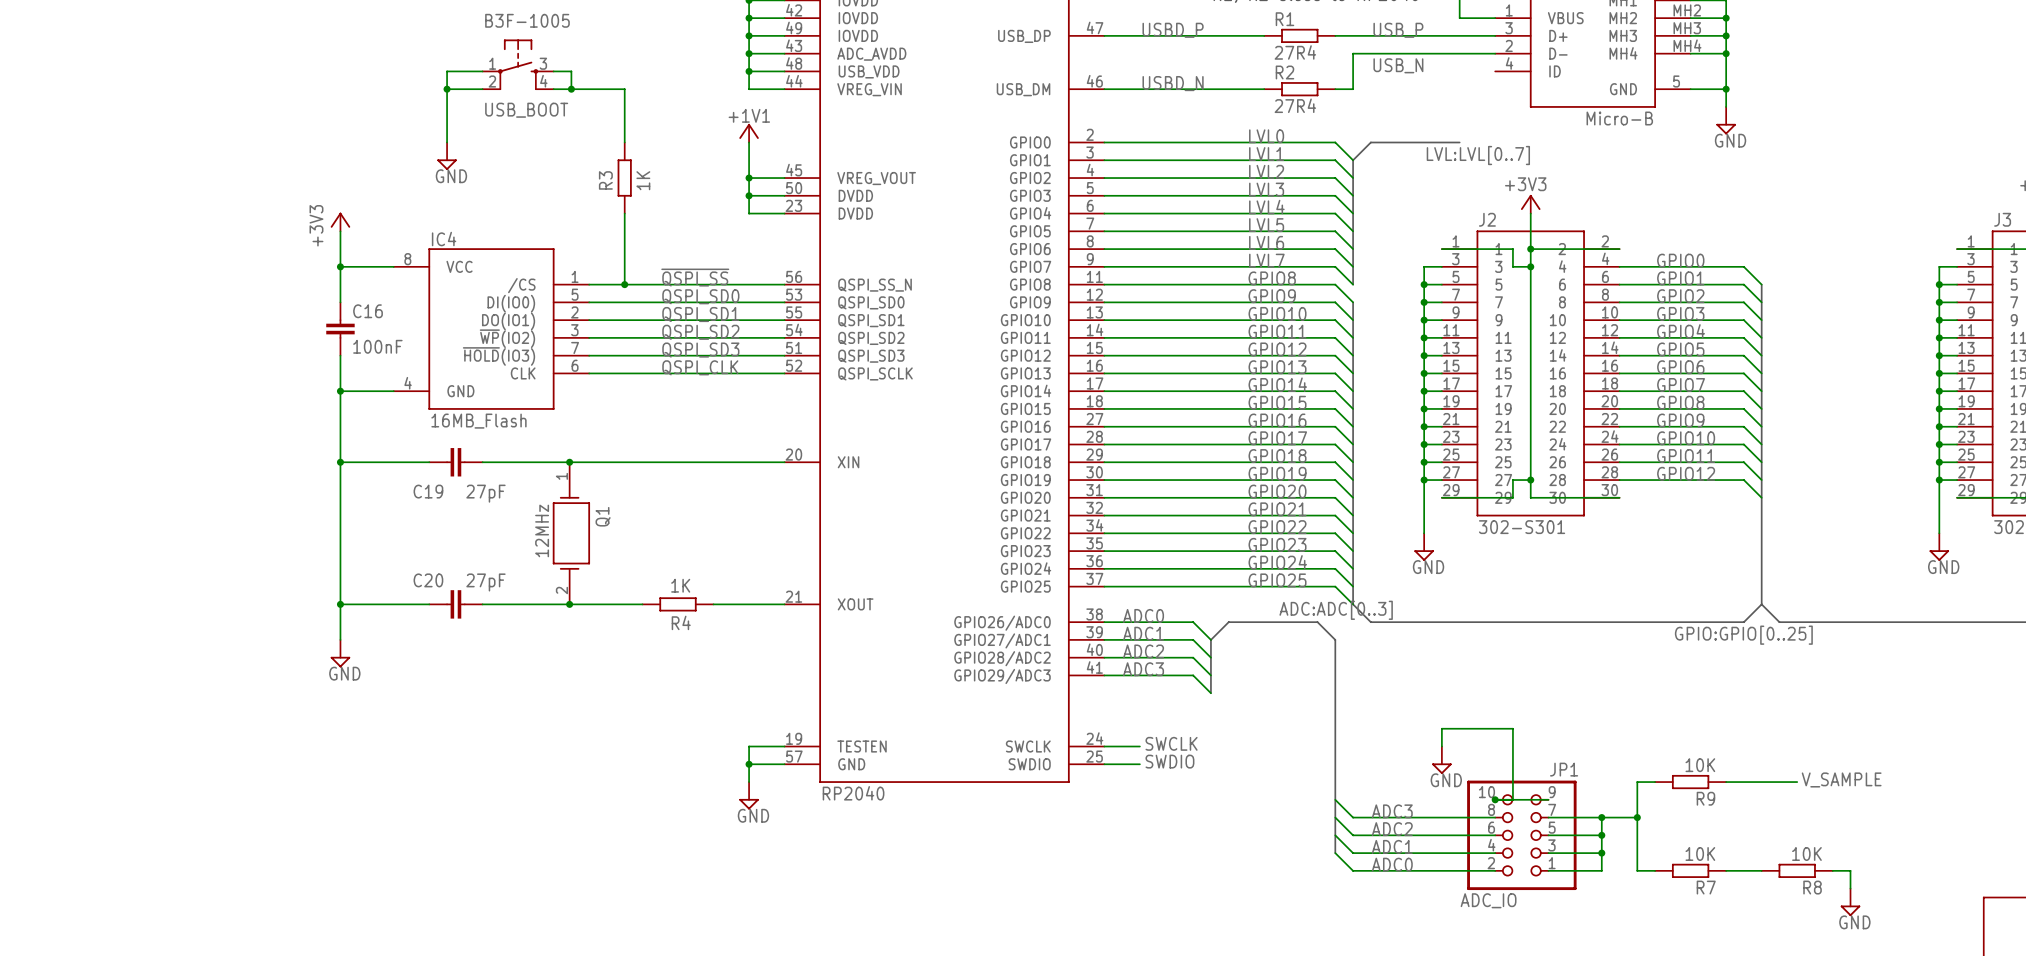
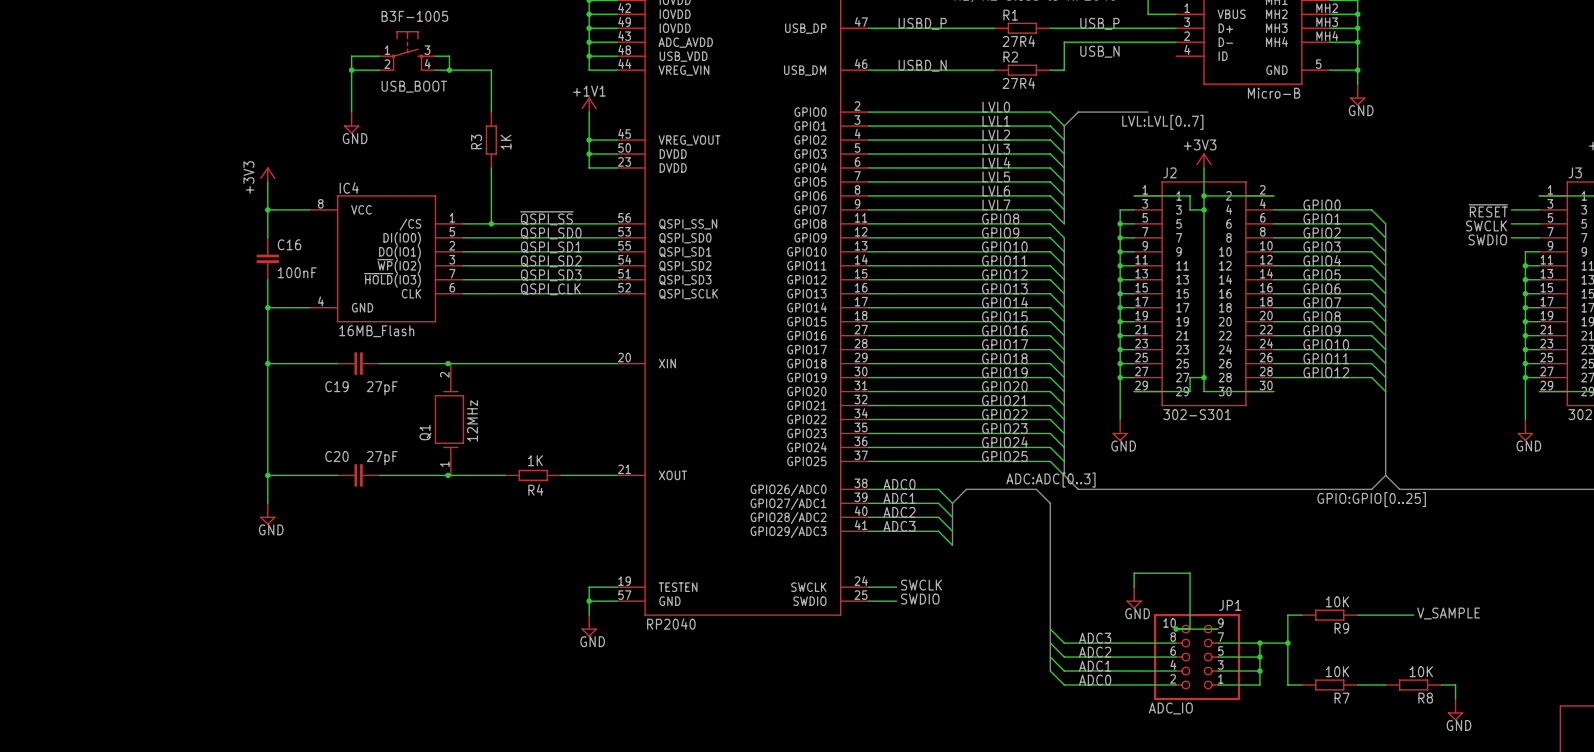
wire: (1939, 266) (1939, 320) -> (1525, 209) (1511, 209)
label: none -> ~{RESET} (1488, 210)
wire: none -> (1511, 223) (1525, 223)
junction: (1939, 284) -> none
label: none -> SWCLK (1486, 225)
wire: none -> (1511, 237) (1525, 237)
junction: (1939, 302) -> none
label: none -> SWDIO (1487, 239)
junction: (1939, 320) -> none
Q1 rotation: 0° (571, 533) -> 180° (449, 419)

